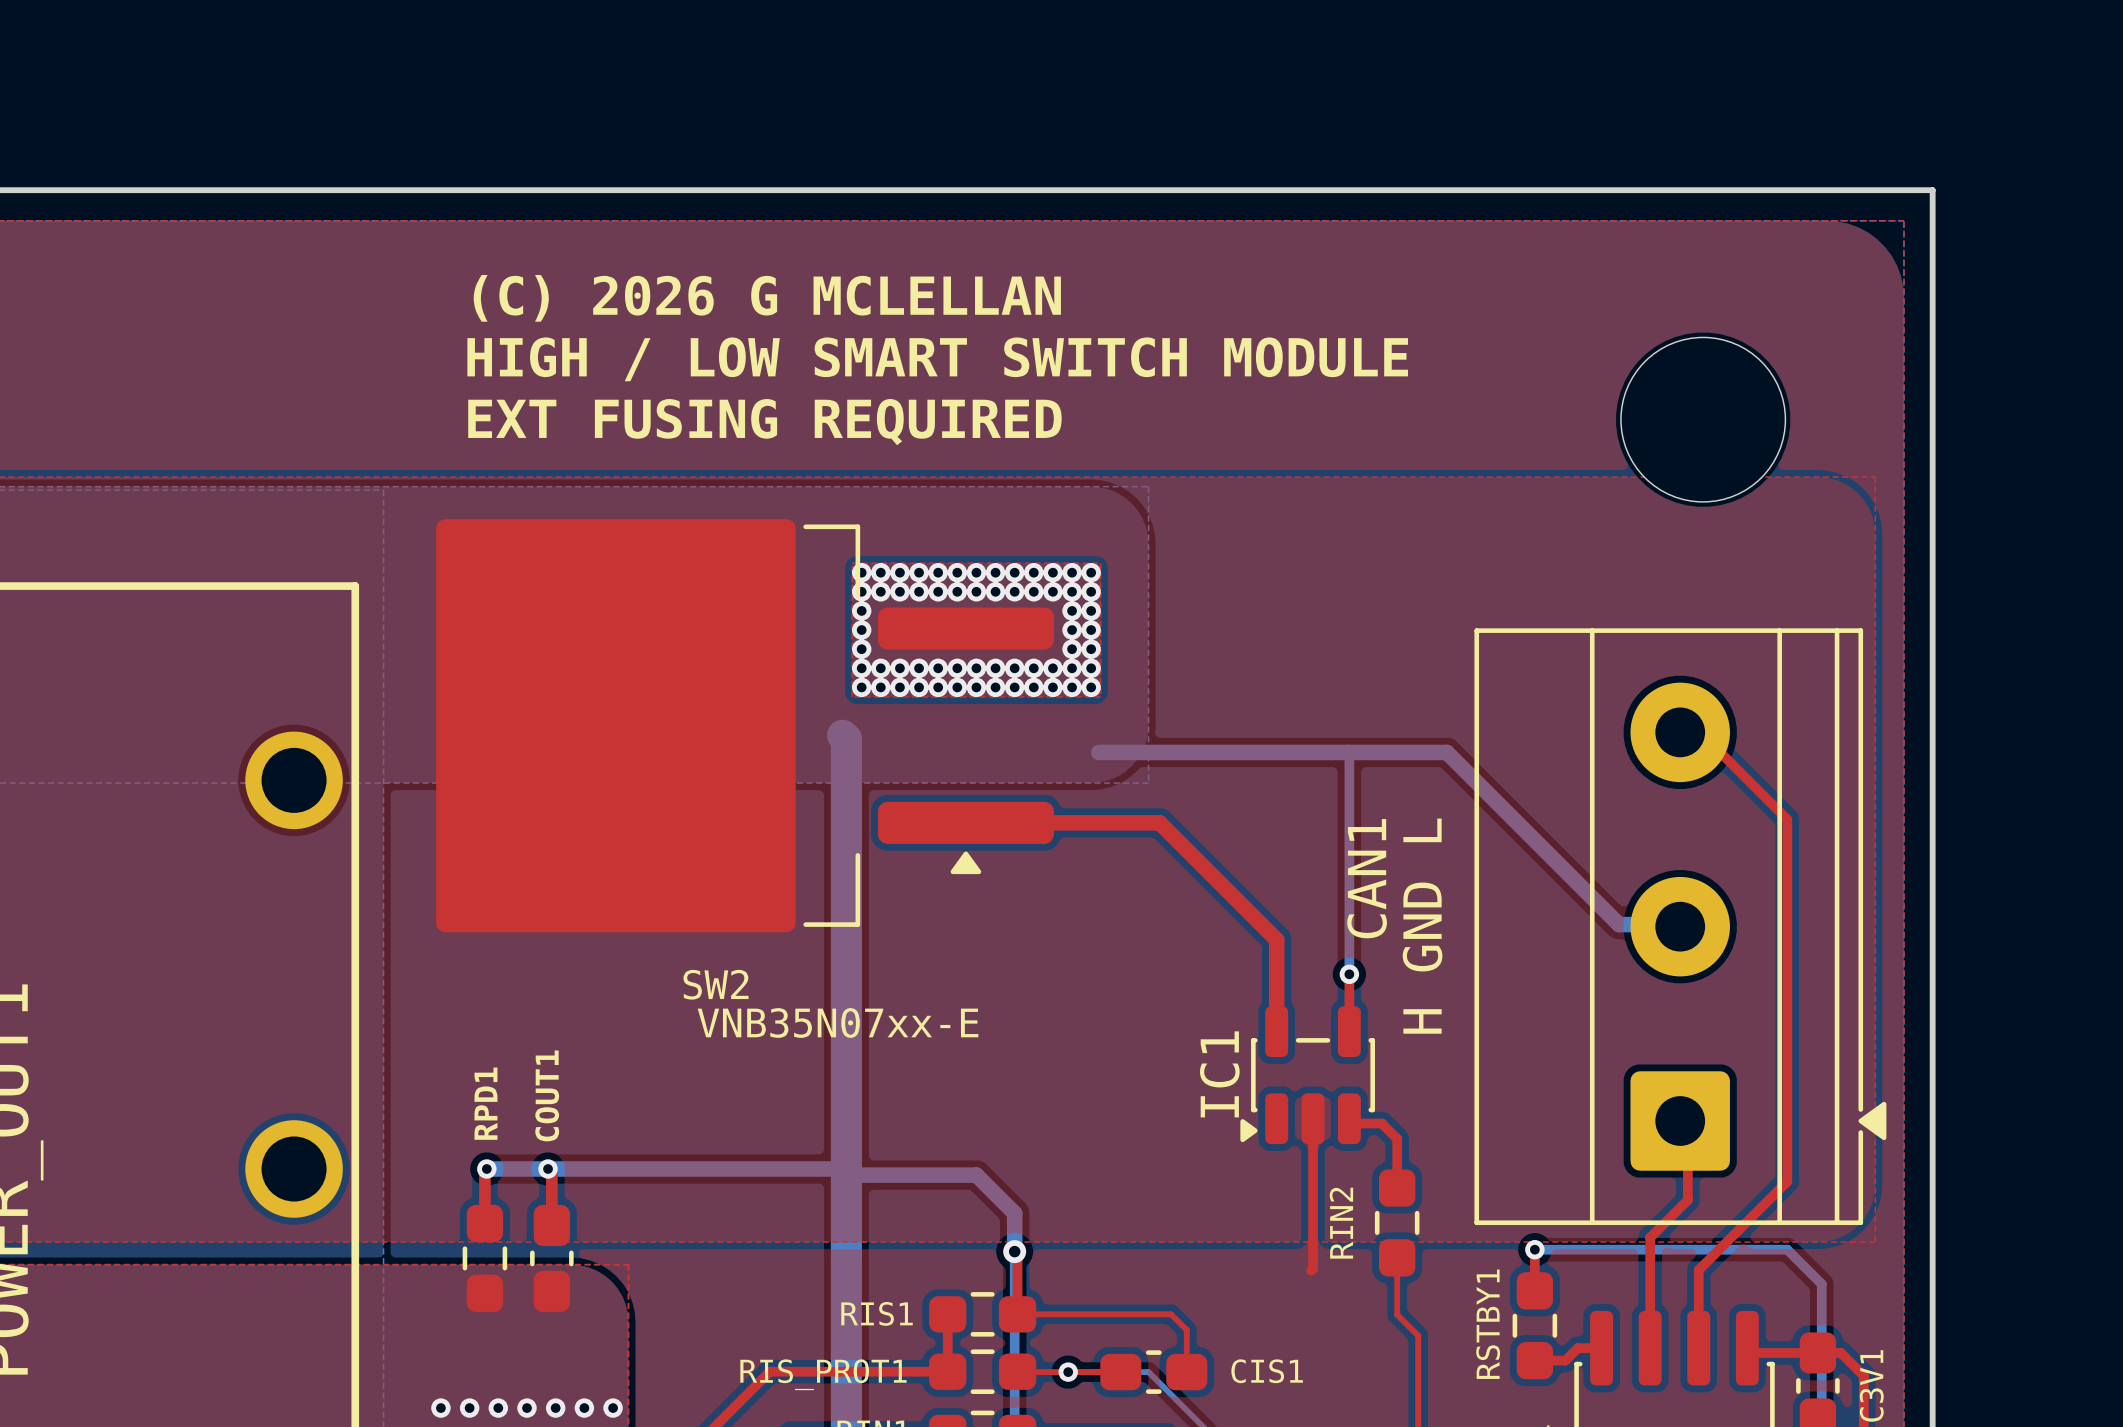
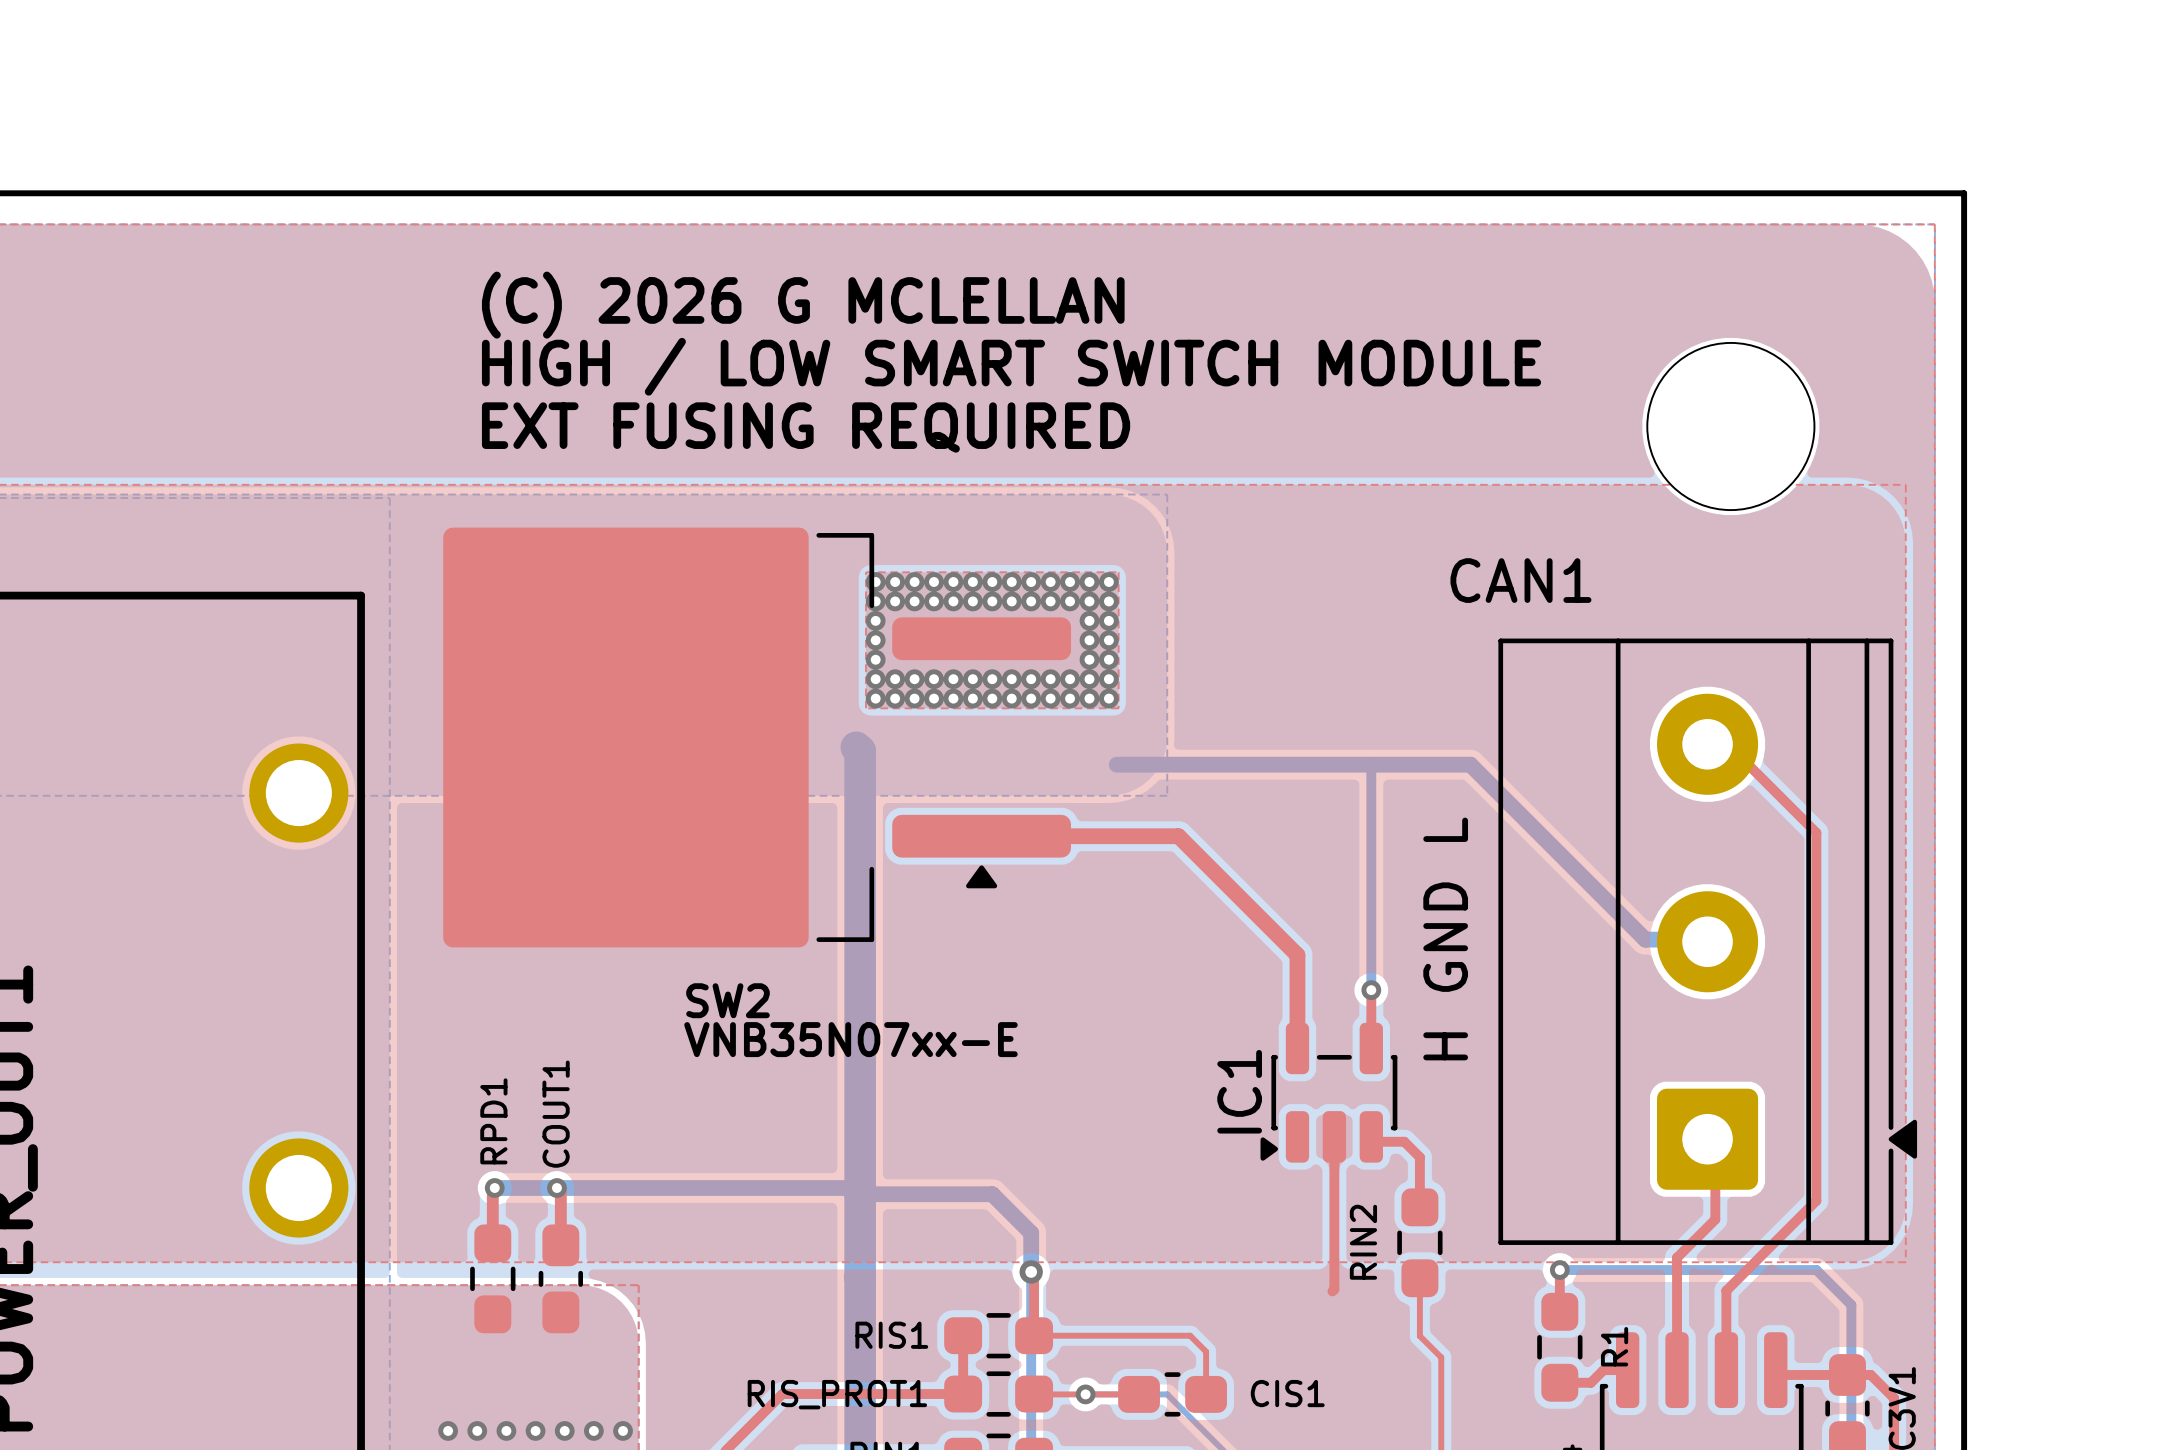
CAN1 name rotation: 0° (1367, 878) -> 90° clockwise (1520, 580)
CAN1 name position: CAN1 (1367, 878) -> CAN1 (1520, 580)
RSTBY1 name: RSTBY1 (1488, 1324) -> R1 (1614, 1346)

